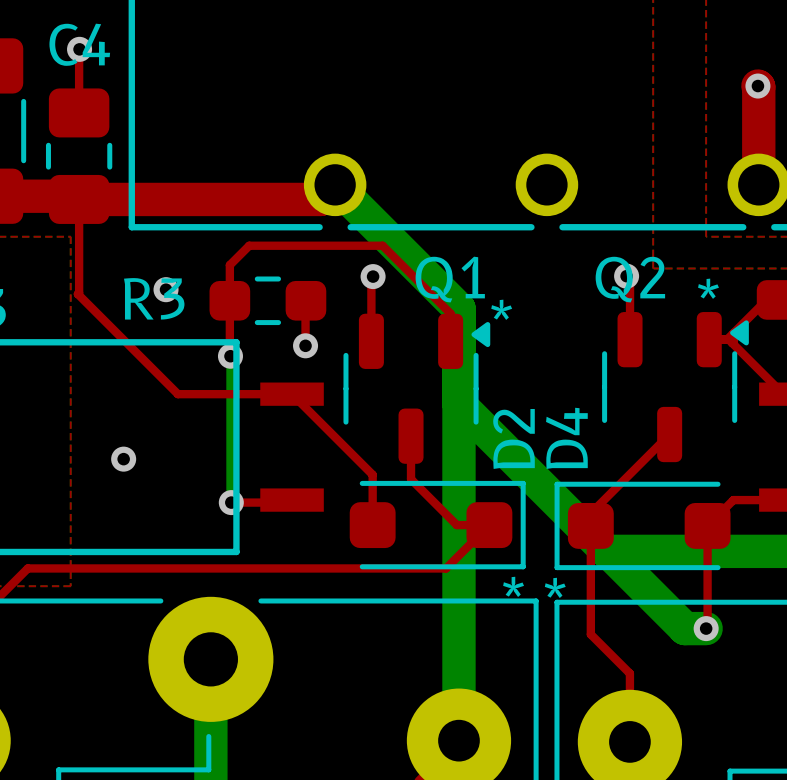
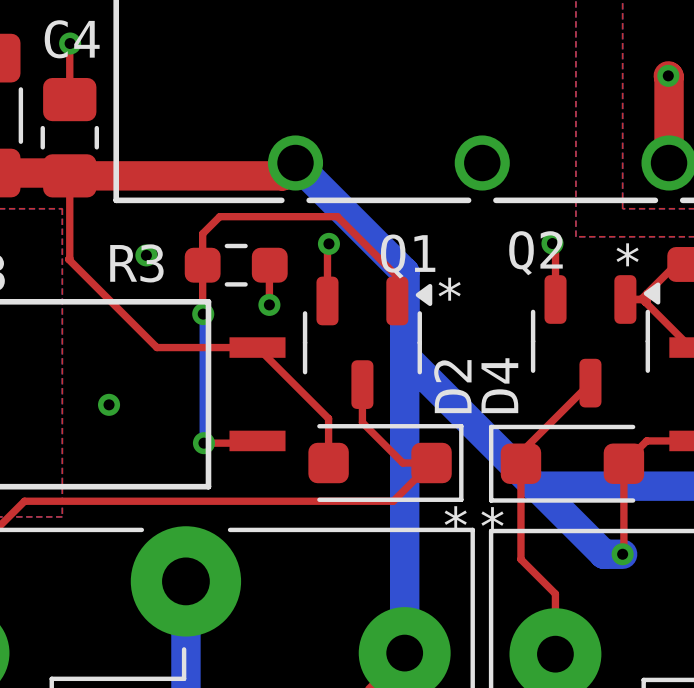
Q1 name position: Q1 (450, 279) -> Q1 (408, 256)
Q2 name position: Q2 (630, 279) -> Q2 (535, 253)
text position: * (501, 309) -> * (449, 289)

